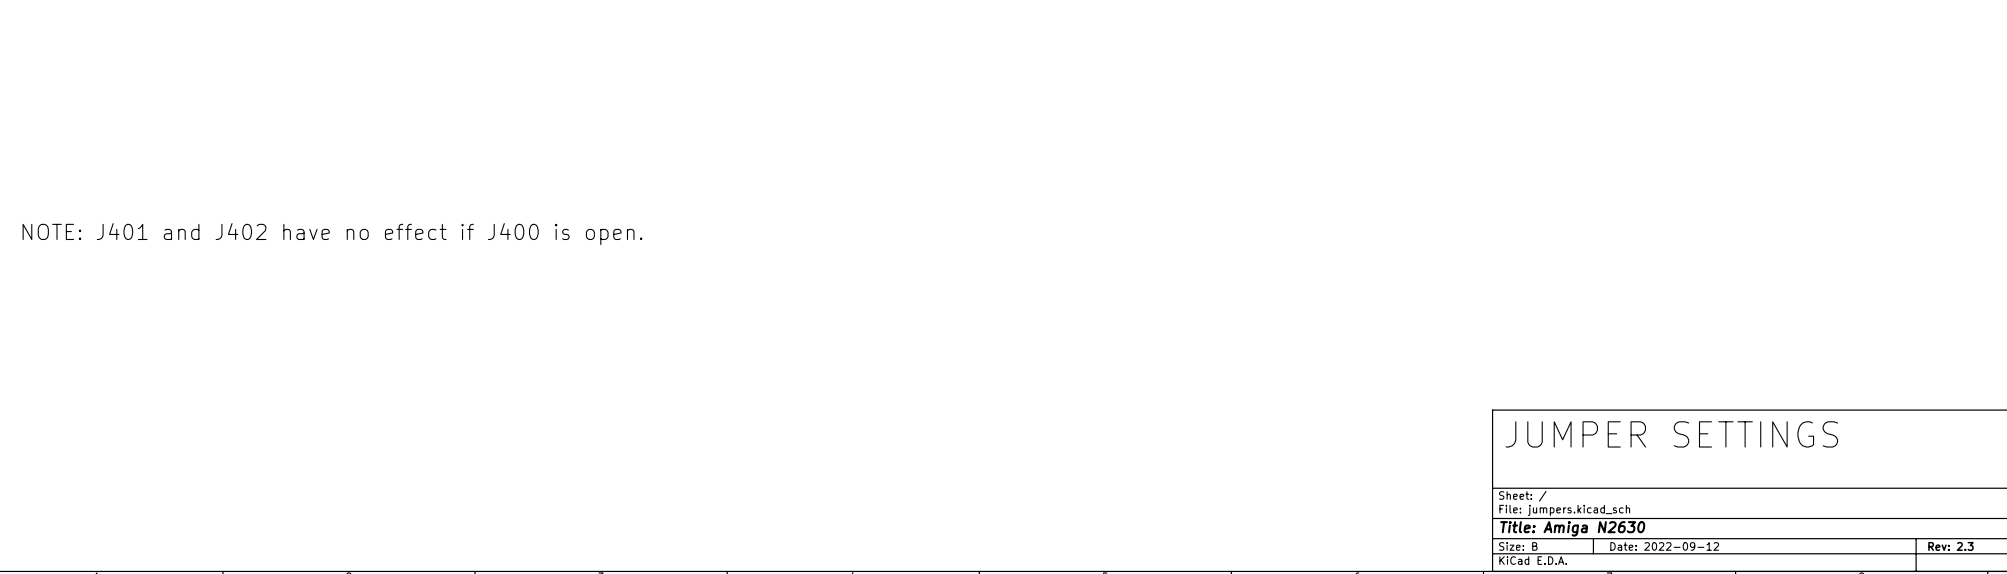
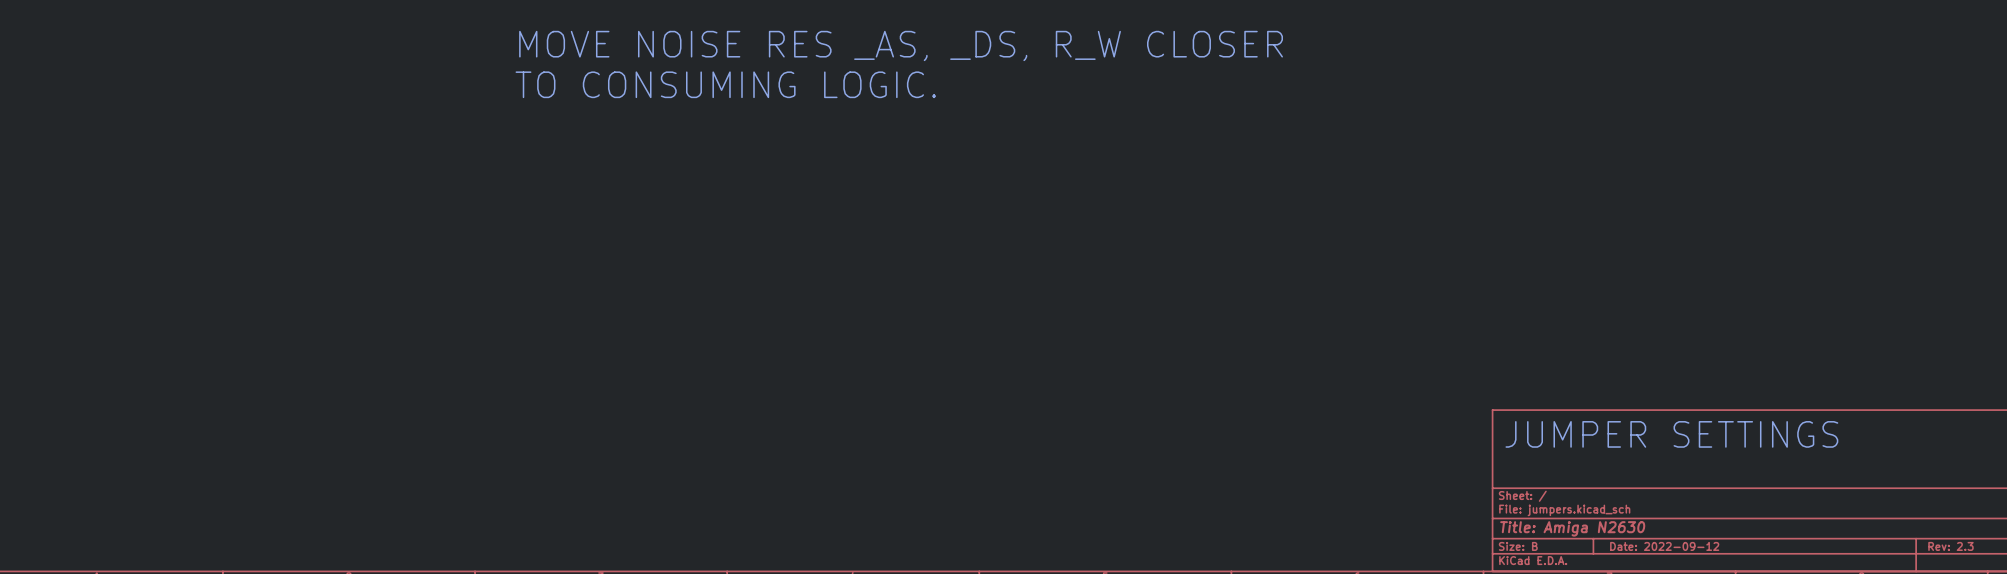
text: none -> MOVE NOISE RES _AS, _DS, R_W CLOSER (901, 45)
text: none -> TO CONSUMING LOGIC. (725, 84)
text: NOTE: J401 and J402 have no effect if J400 is open. (332, 234) -> none

